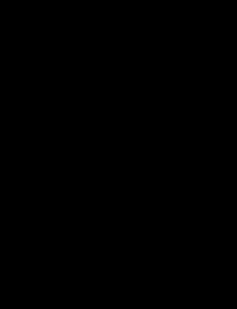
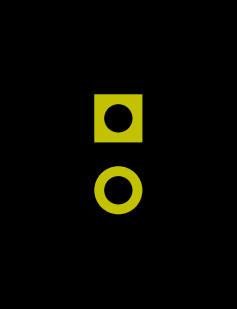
part: none -> (118, 154)

